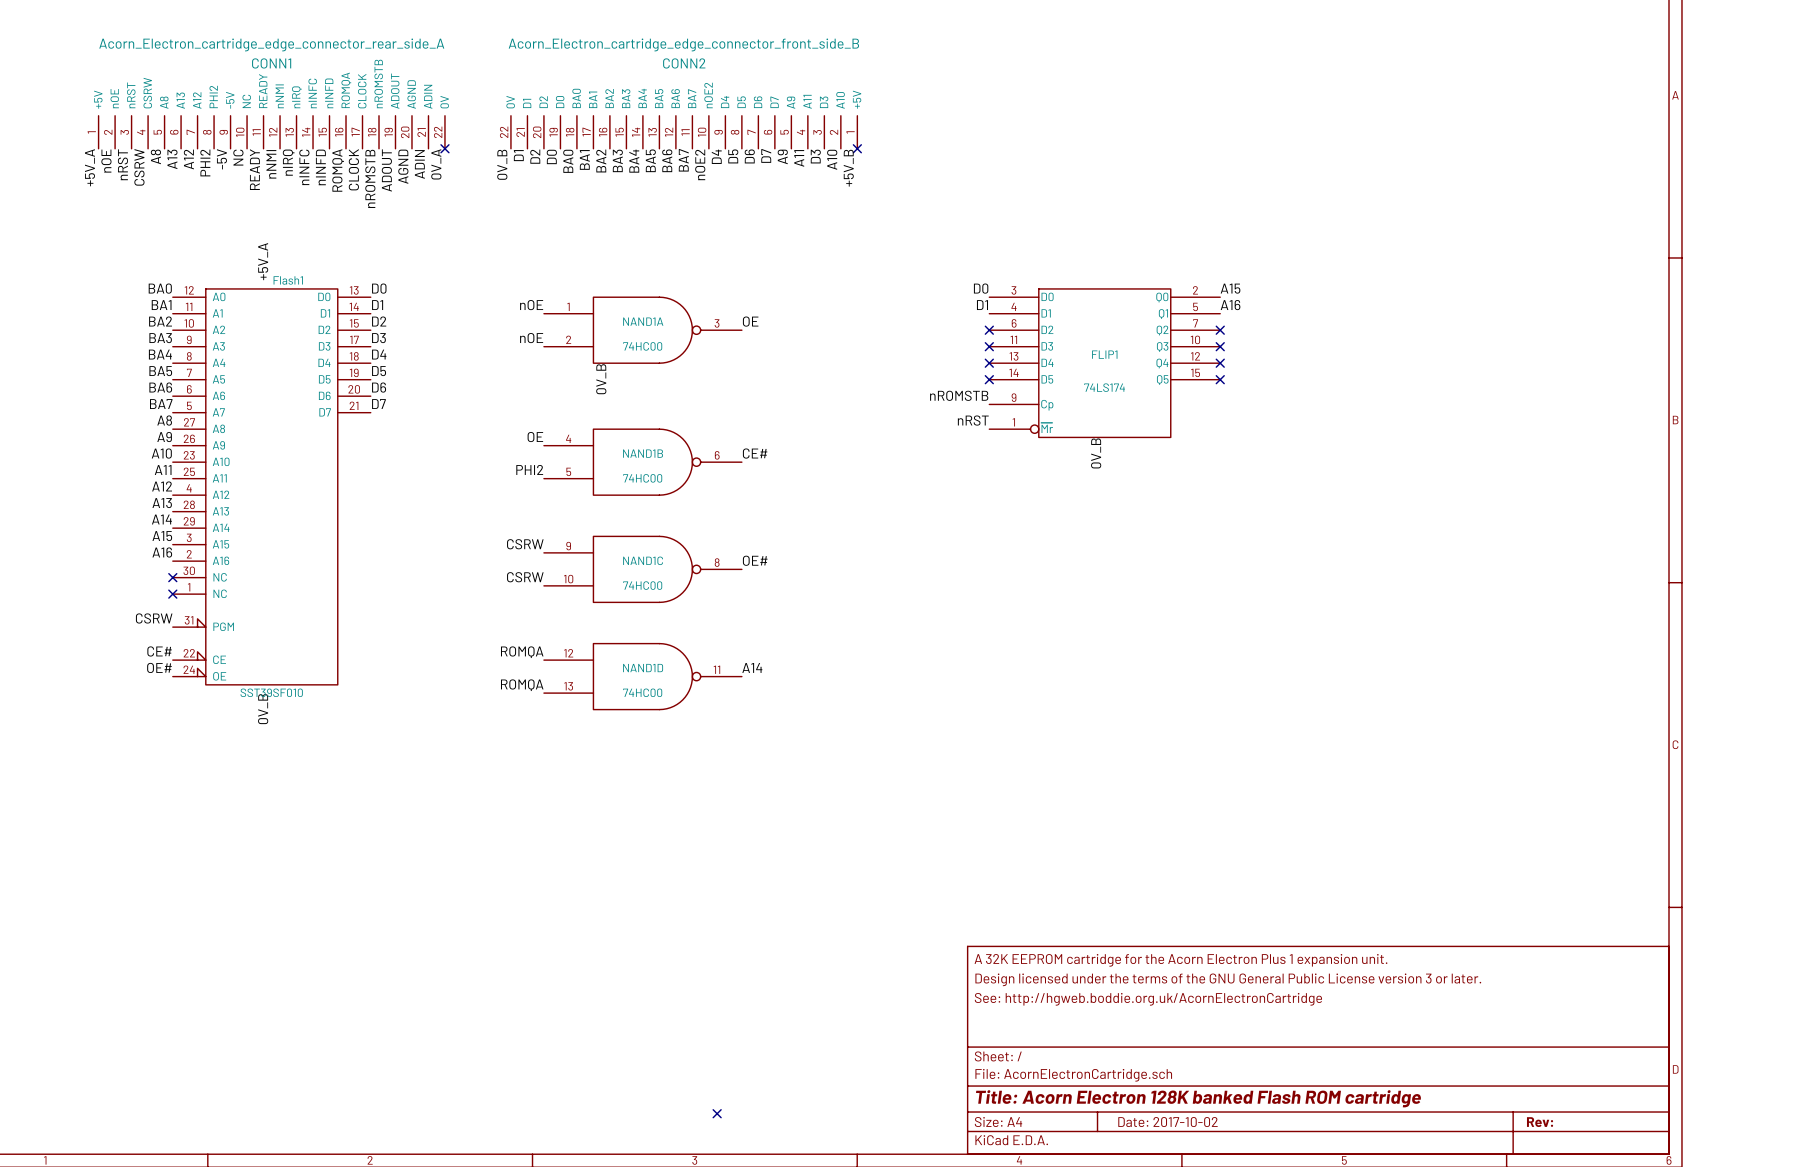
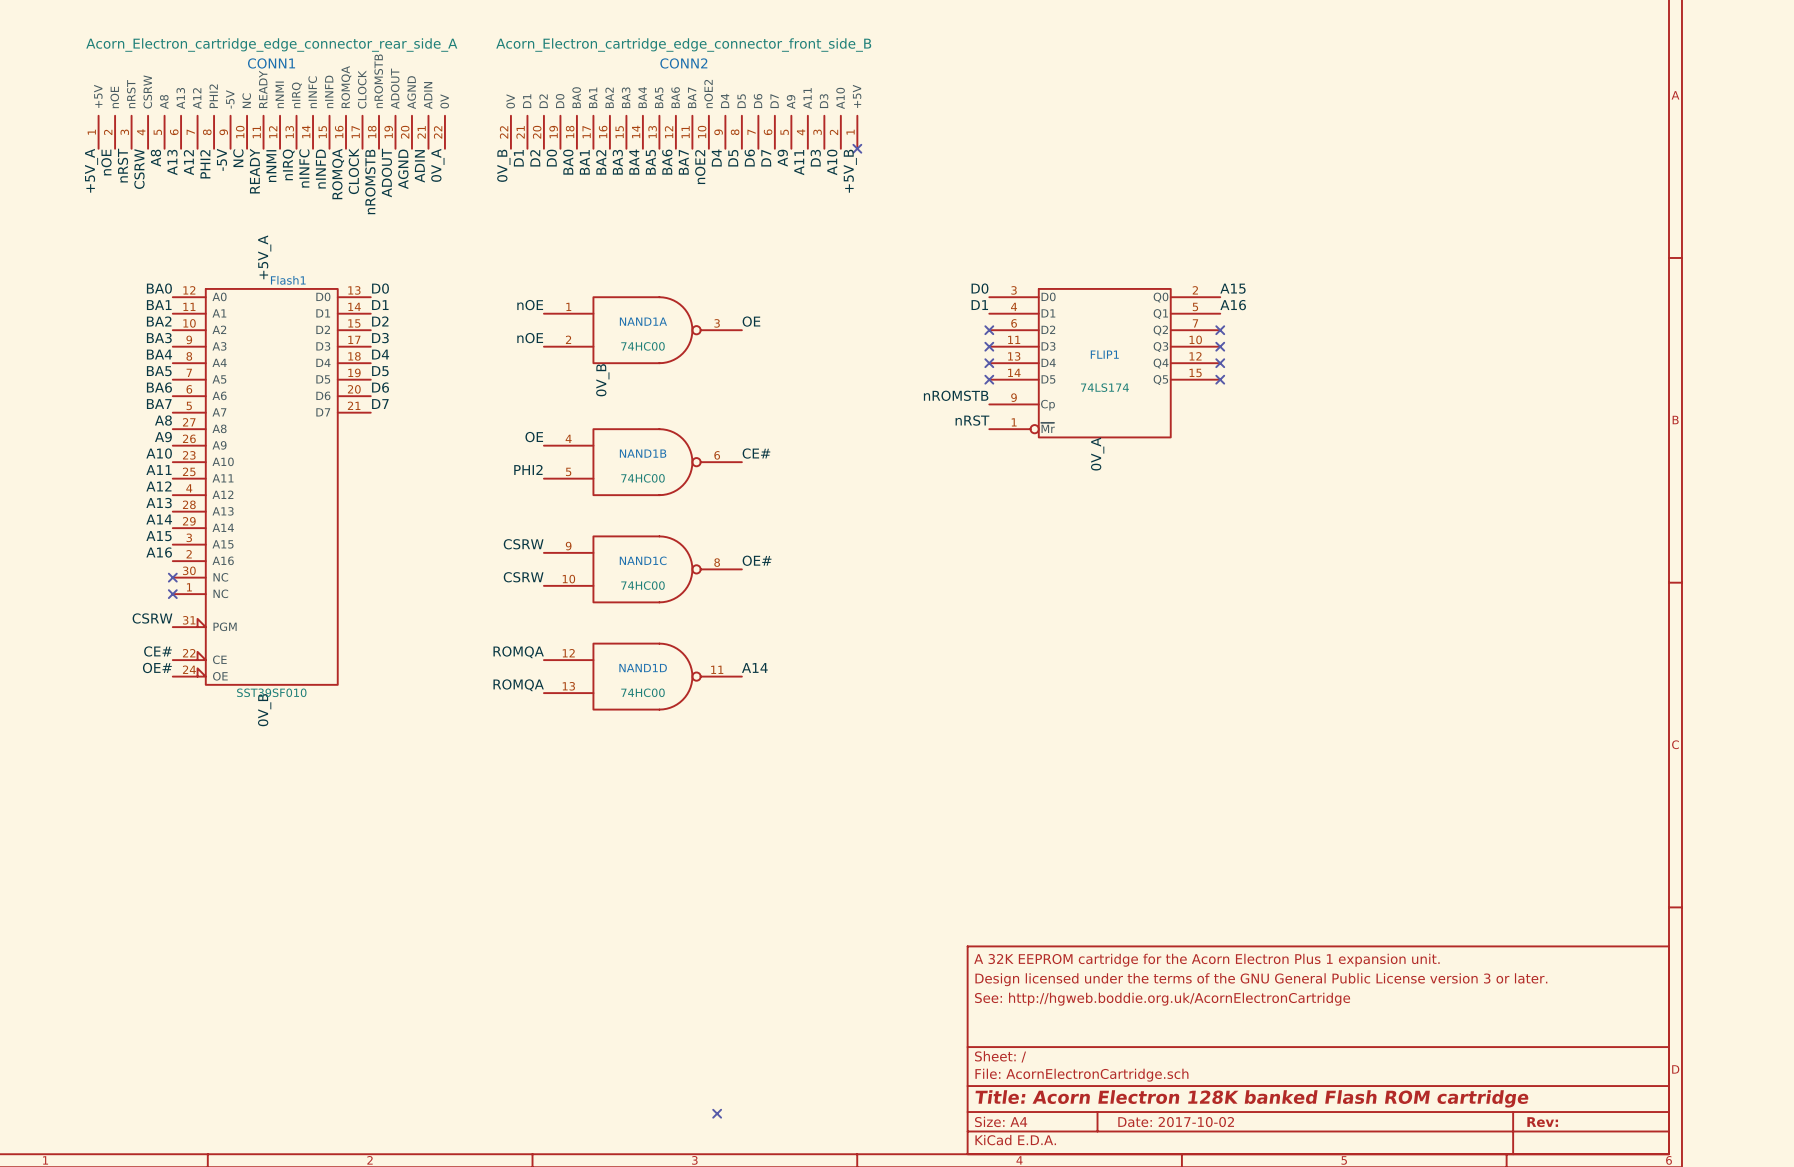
no-connect mark: (444, 148) -> none
label: 0V_B (1096, 453) -> 0V_A (1097, 454)

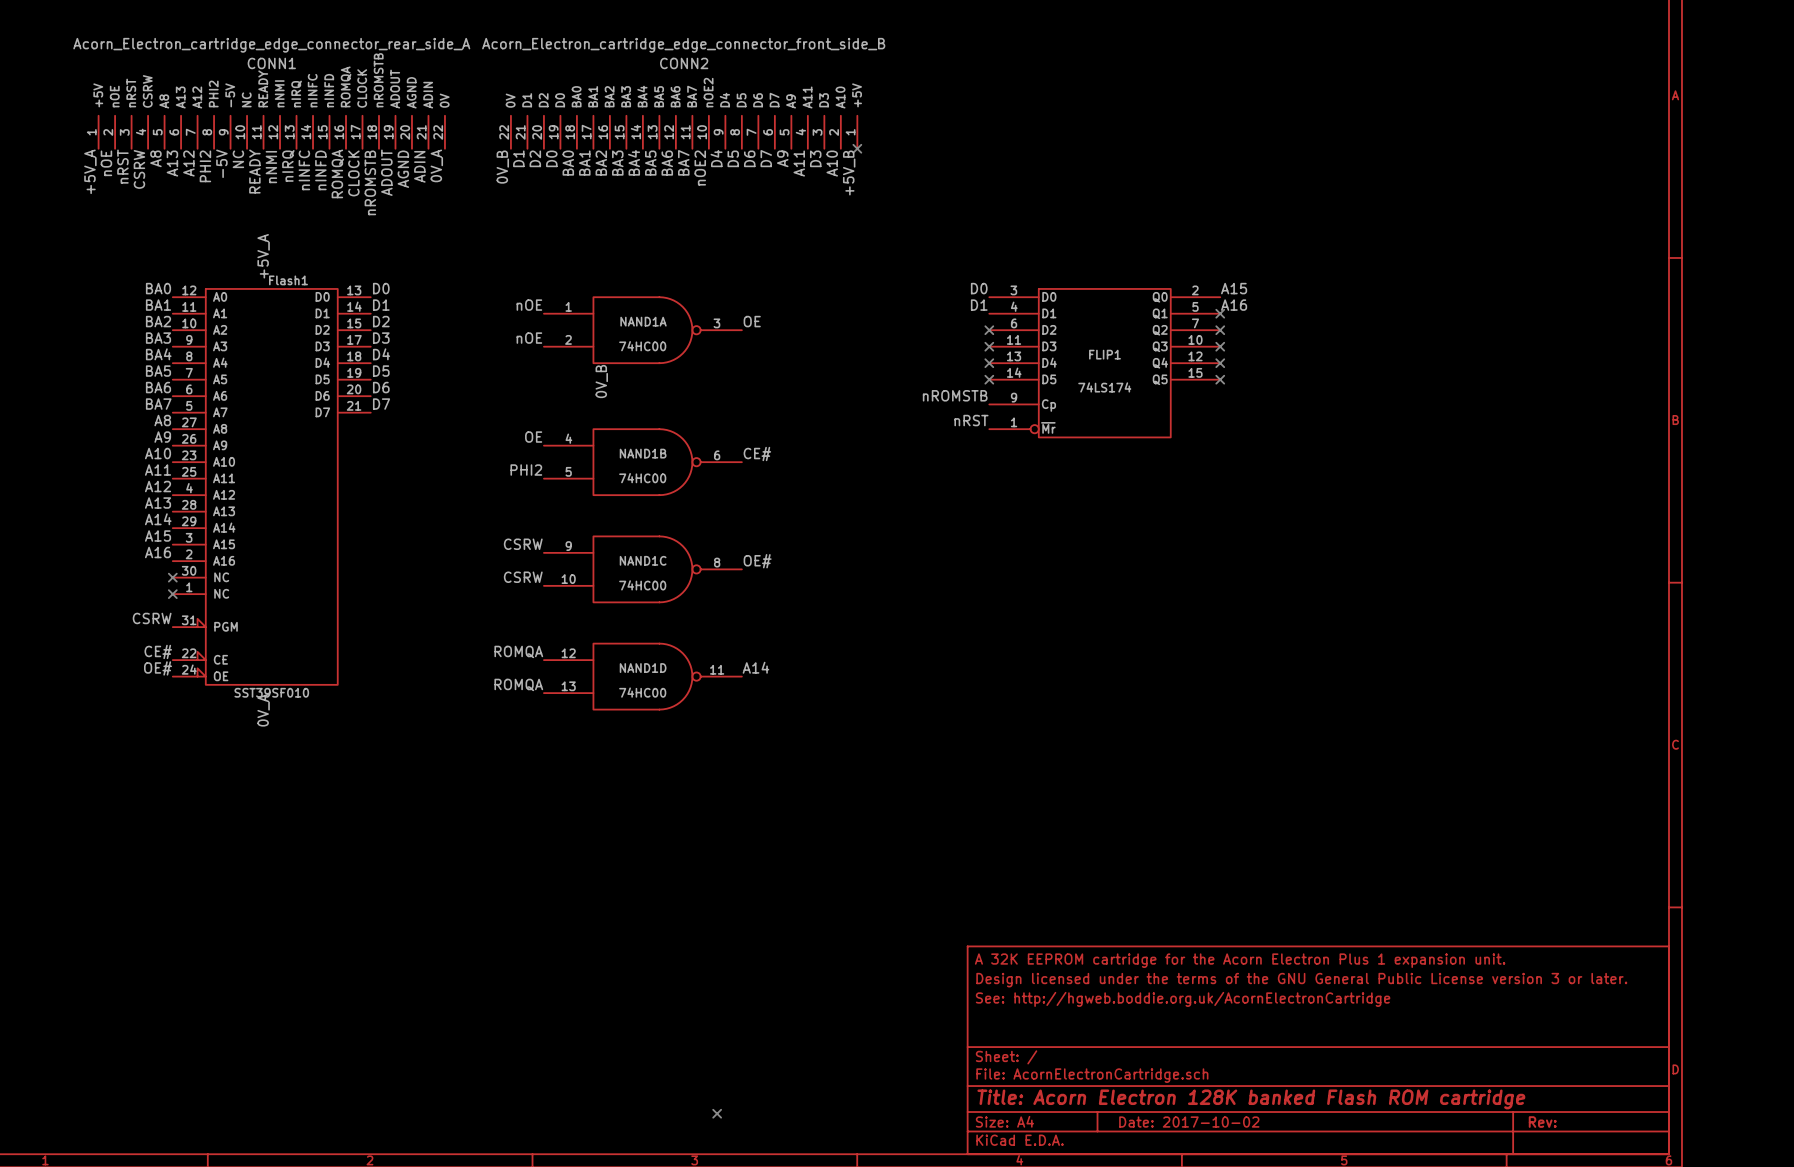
no-connect mark: none -> (1220, 313)
label: 0V_A (1097, 454) -> none
label: 0V_B (264, 710) -> 0V_A (263, 710)

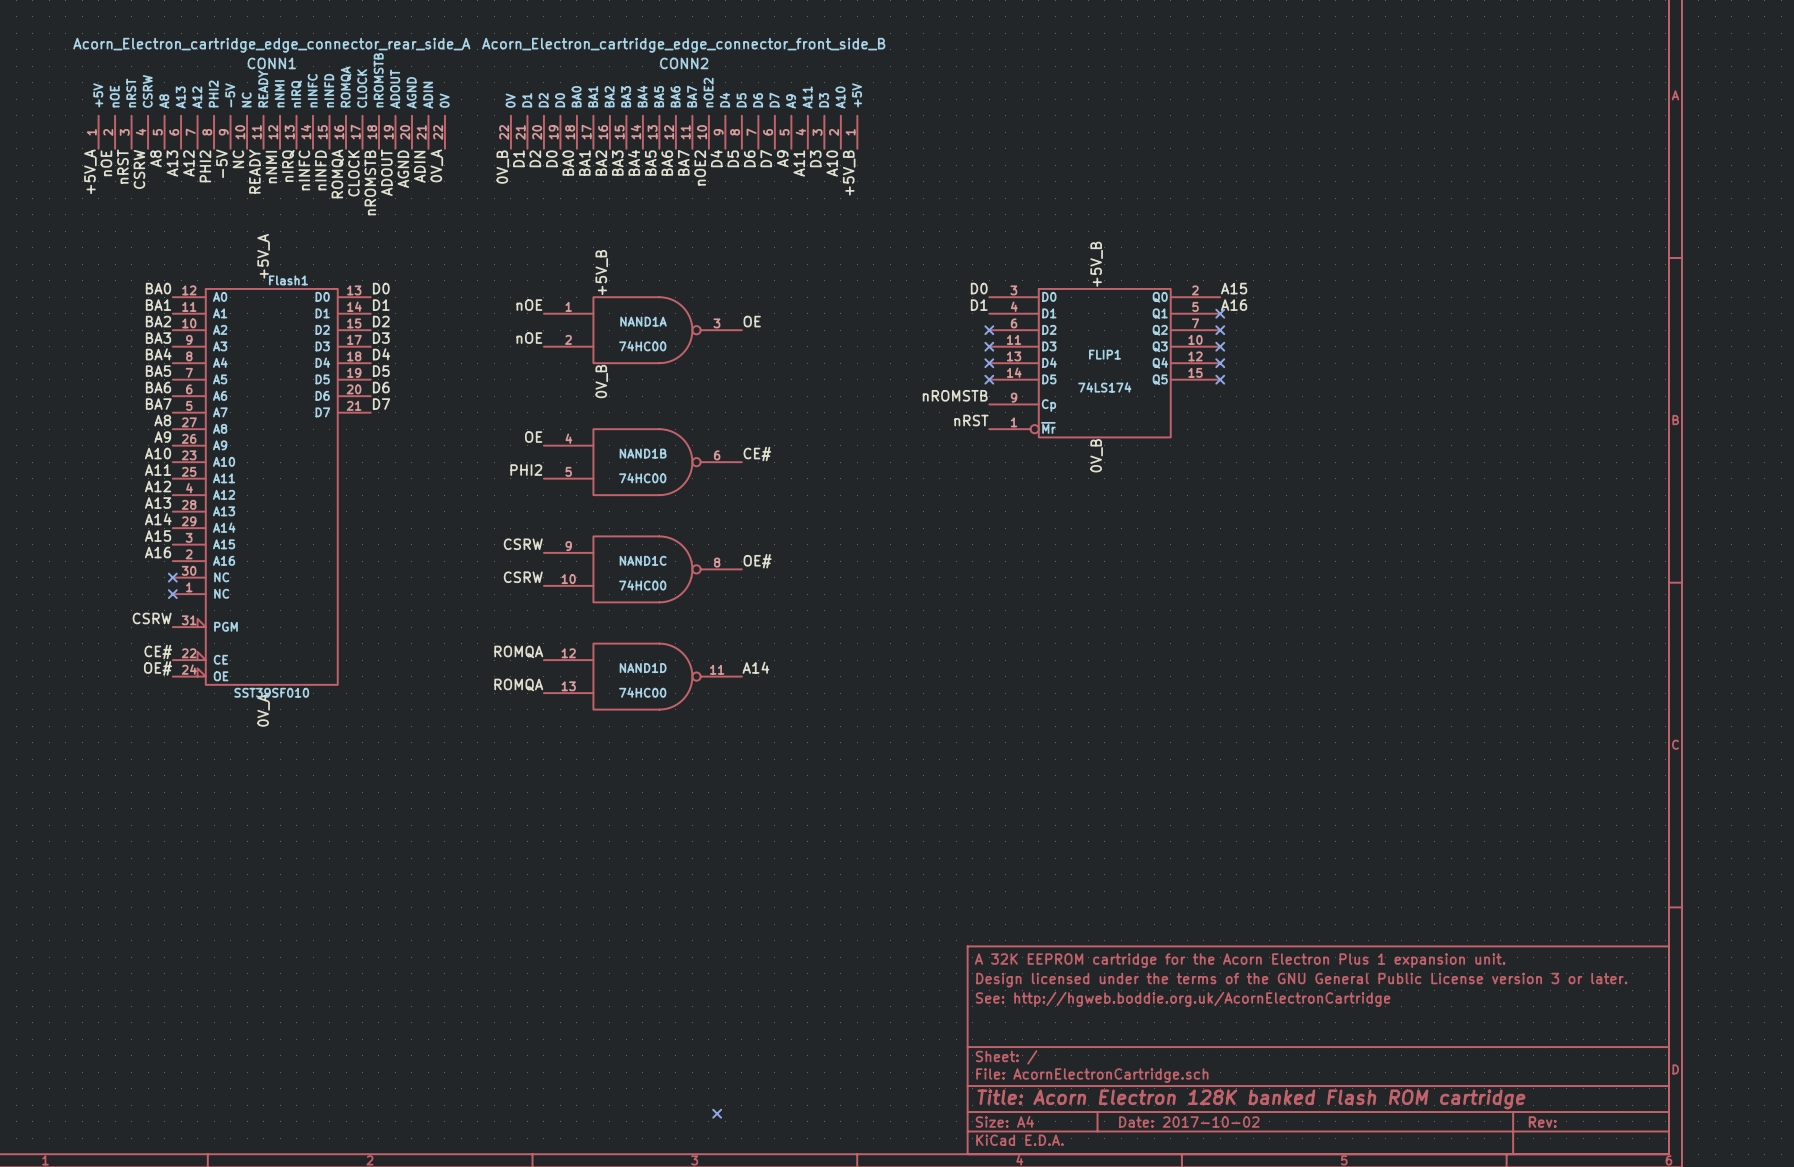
no-connect mark: (857, 148) -> none
label: none -> +5V_B (1096, 264)
label: none -> +5V_B (601, 272)
label: none -> 0V_B (1096, 455)

